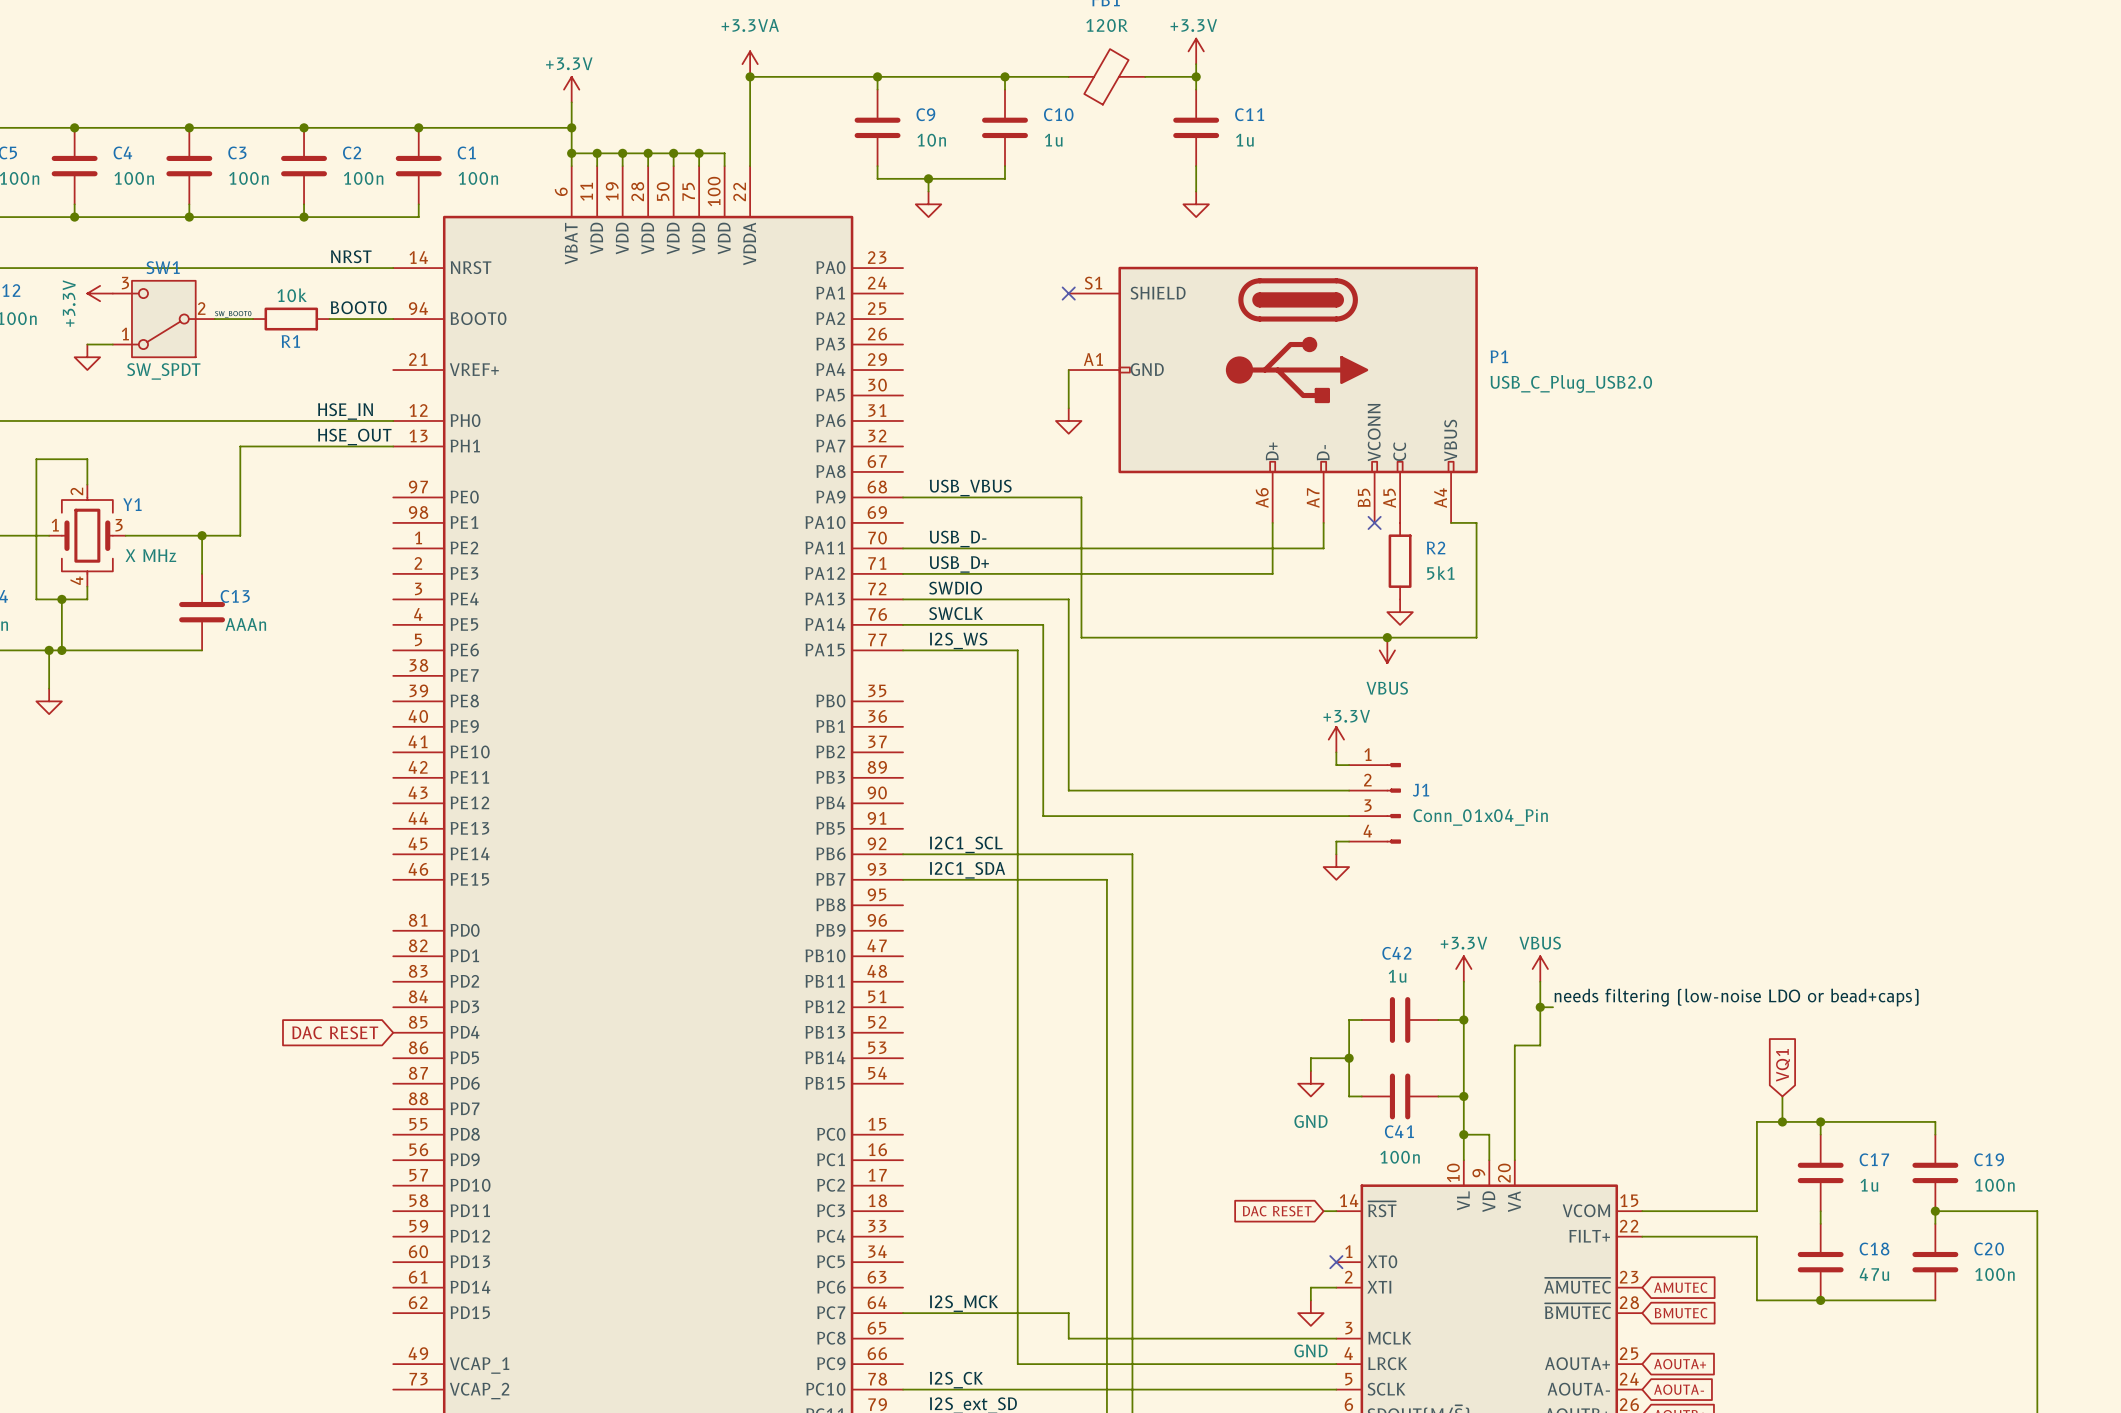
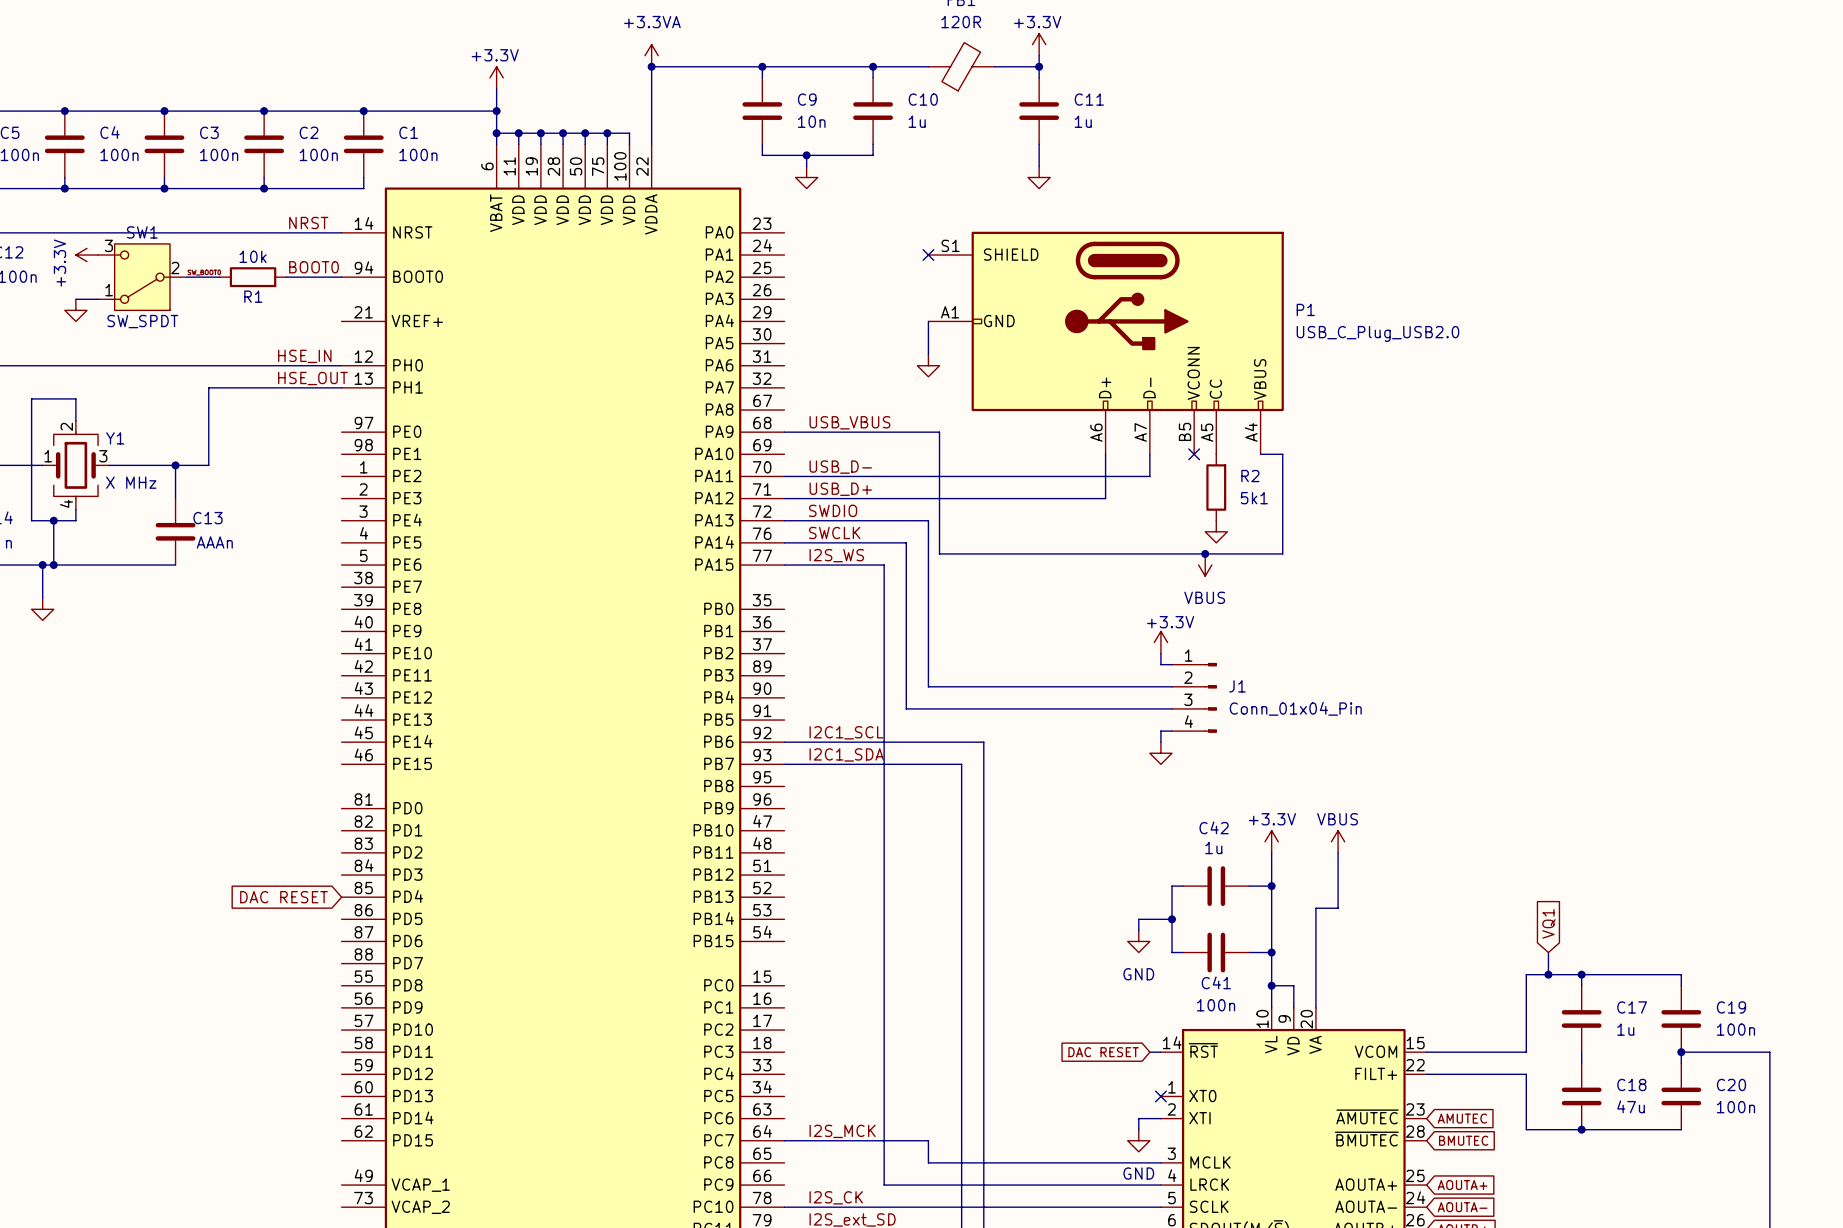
label: needs filtering (low-noise LDO or bead+caps) (1736, 997) -> none
wire: (1540, 1007) (1553, 1007) -> none
junction: (1540, 1007) -> none

